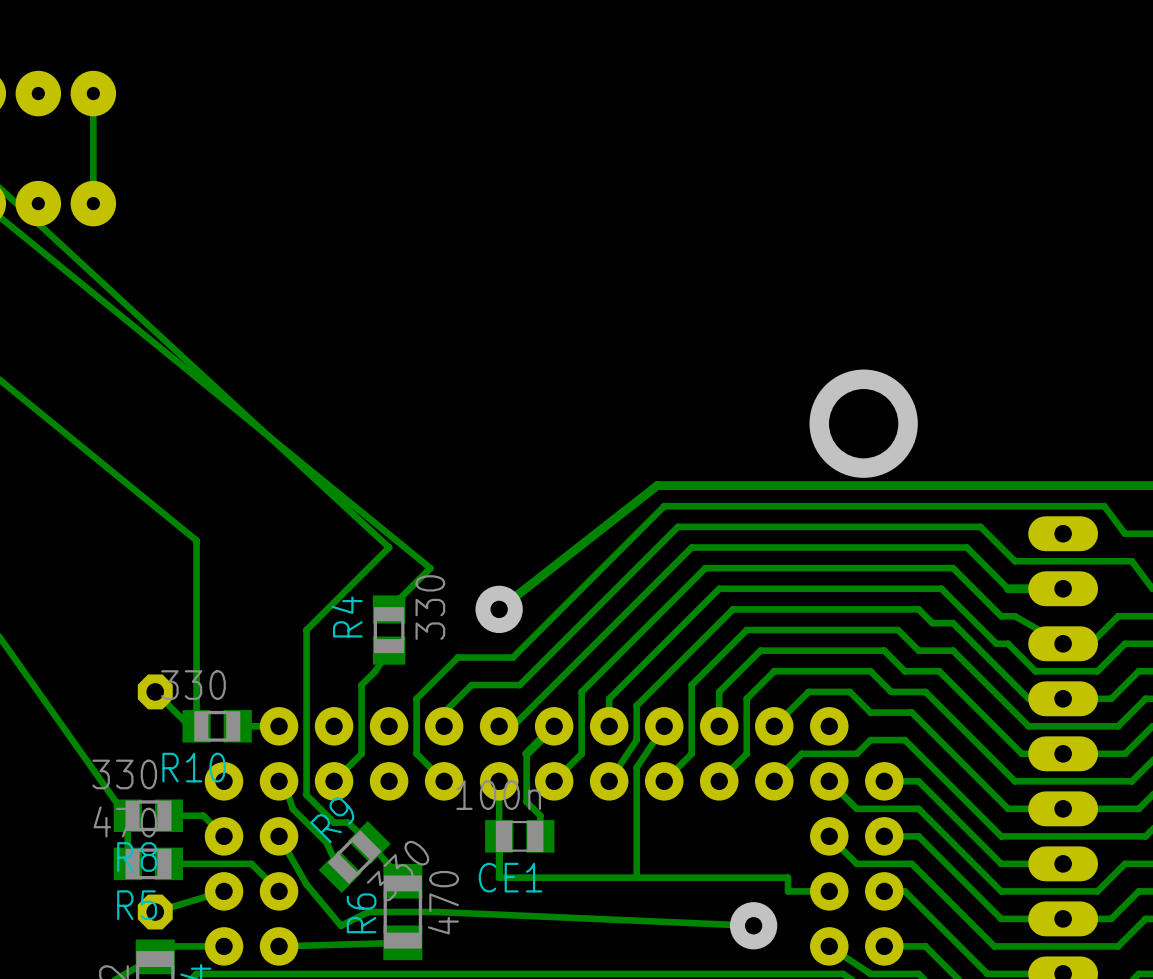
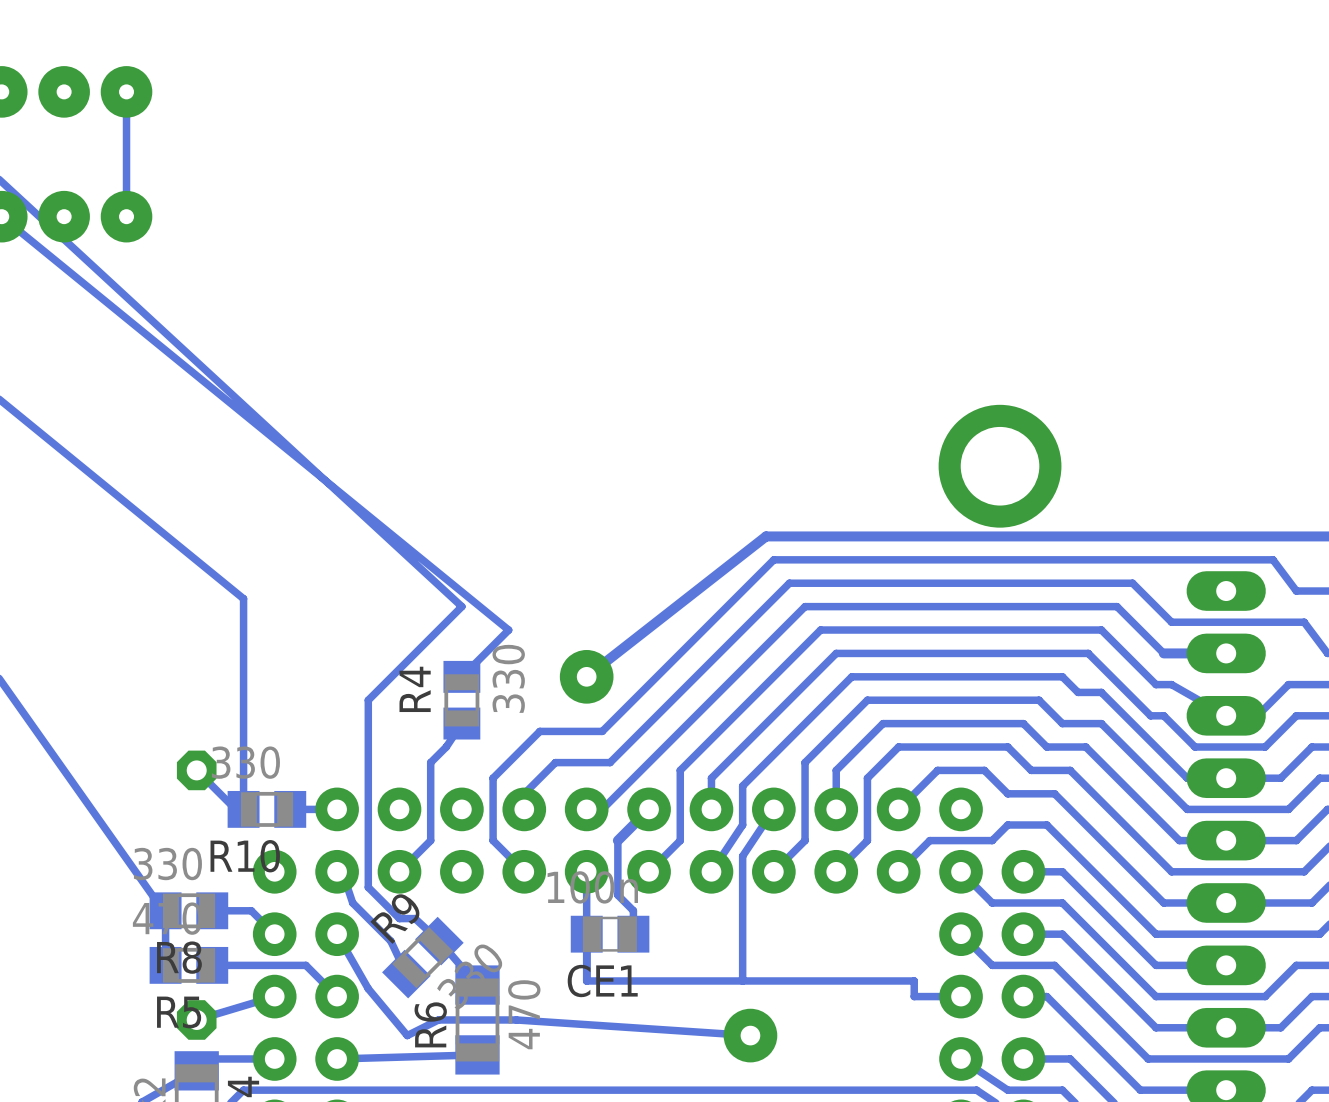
track: (437, 912) (753, 925) -> (516, 1019) (750, 1035)
via position: (753, 925) -> (750, 1035)

